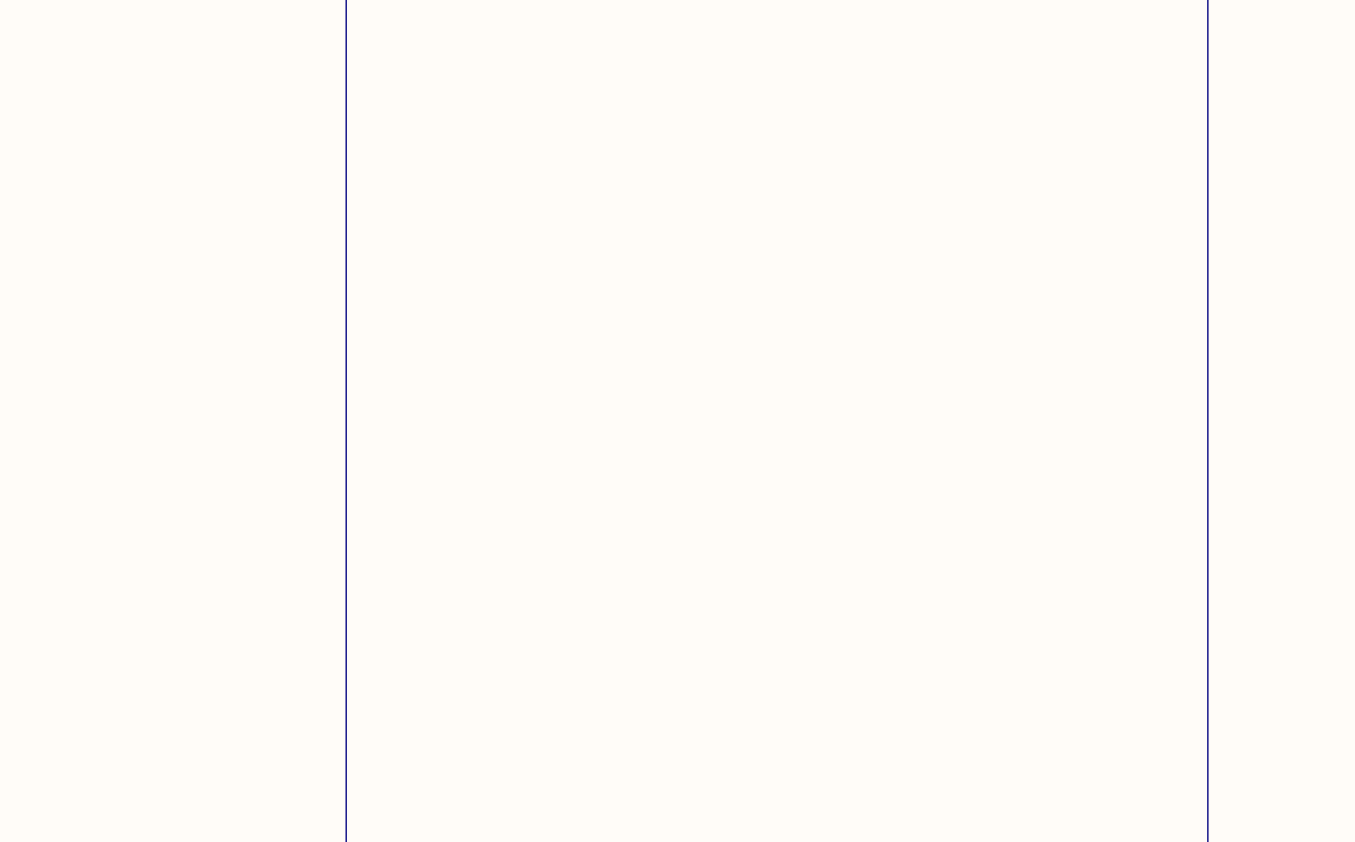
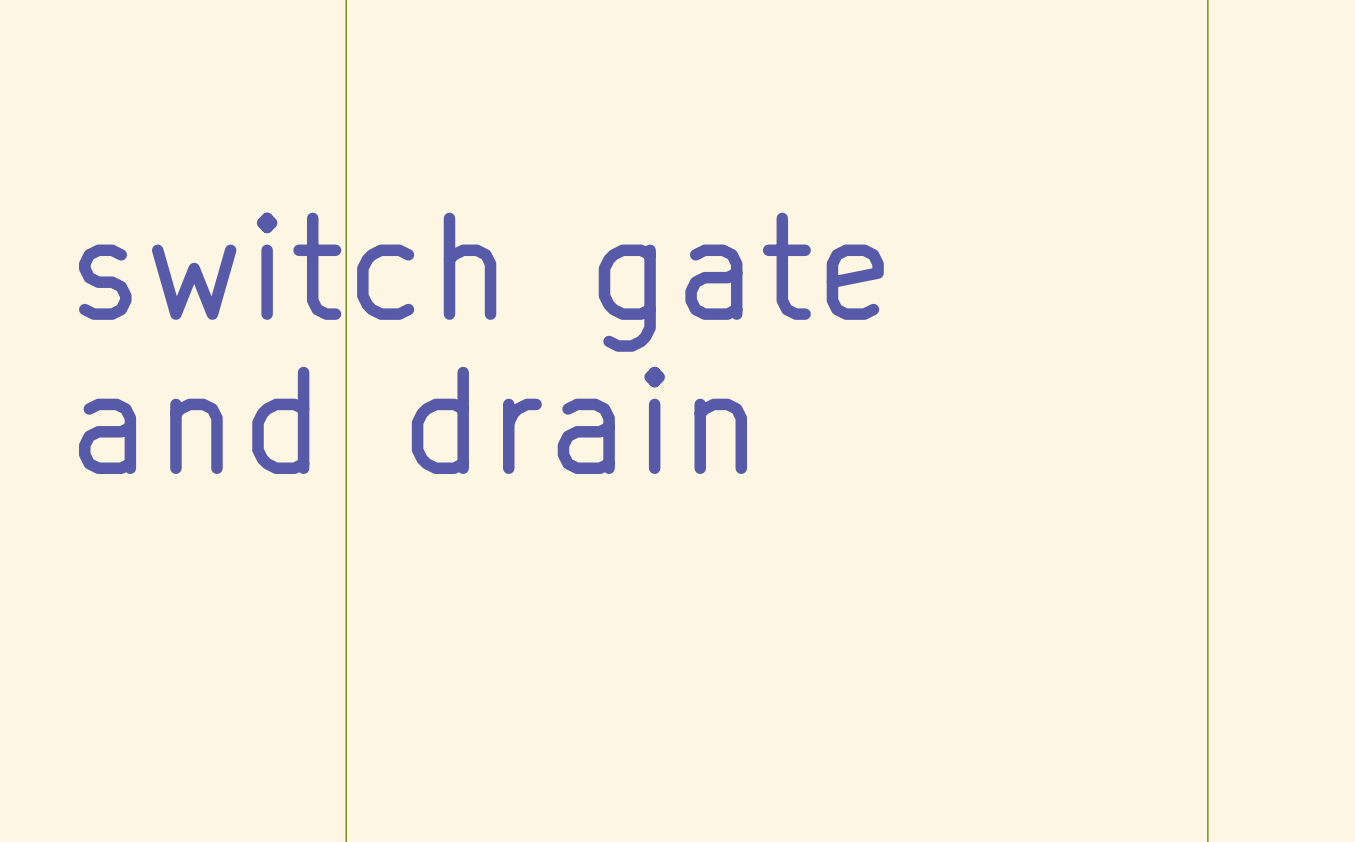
text: none -> switch gate (481, 282)
text: none -> and drain (413, 420)

